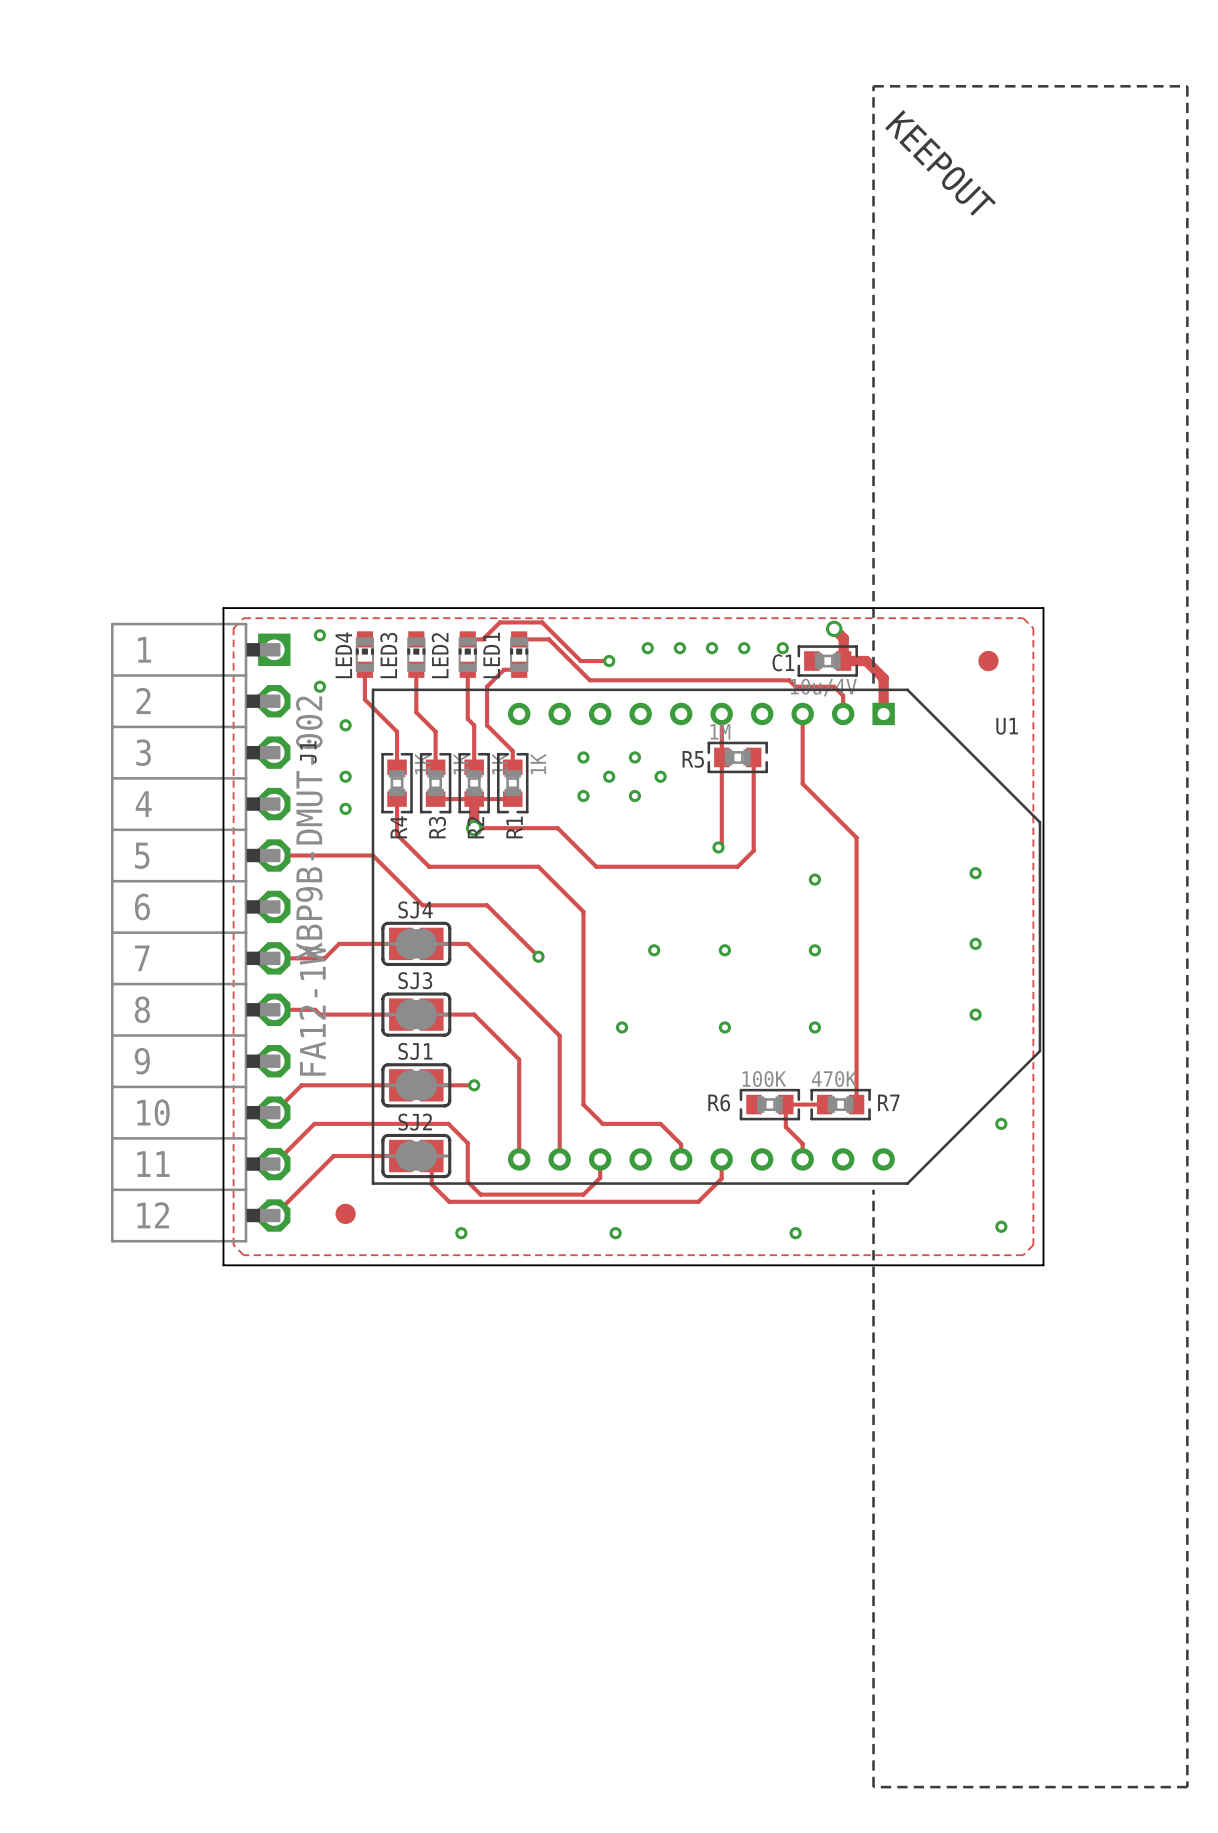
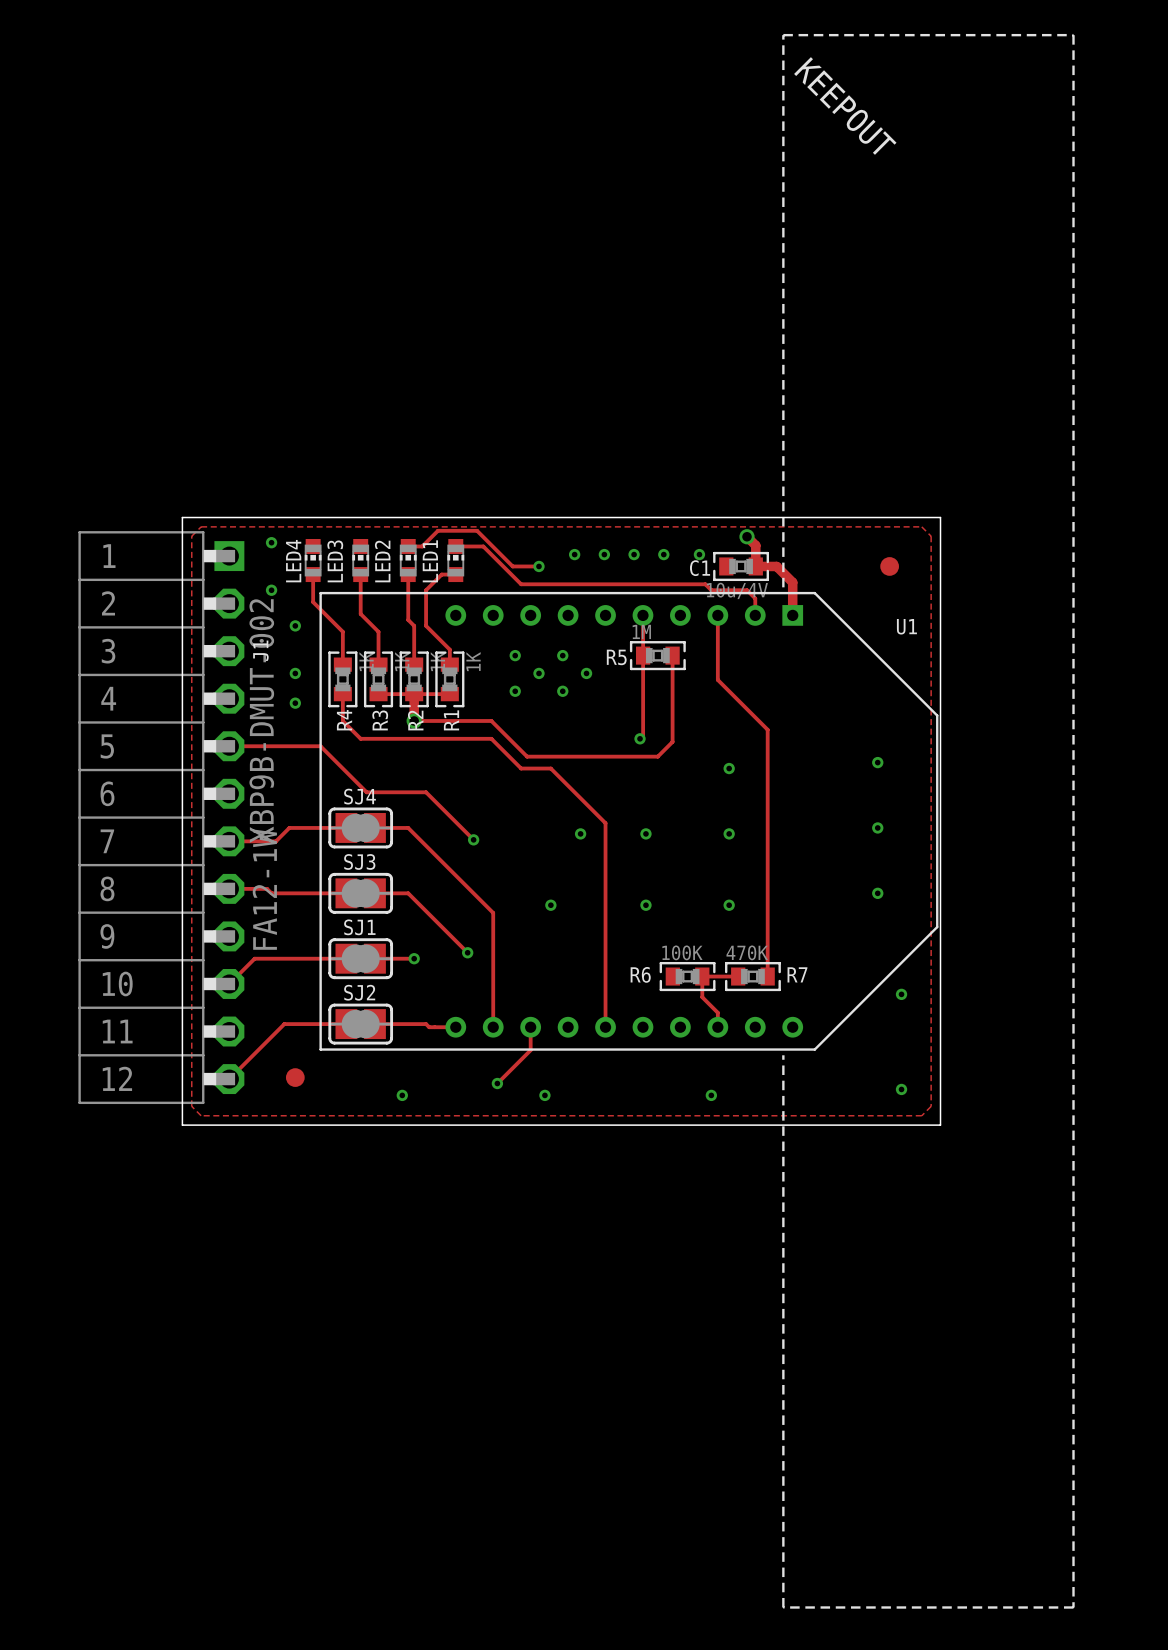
track: (397, 828) (397, 834) (429, 866) (538, 866) (583, 911) (583, 1104) (602, 1123) (660, 1123) (681, 1144) -> (342, 720) (360, 738) (491, 738) (521, 768) (550, 768) (605, 823) (605, 1013)
track: (467, 1014) (474, 1014) (519, 1059) (519, 1159) -> (408, 893) (467, 952)
via: none -> (467, 952)
track: (431, 1156) (431, 1184) (449, 1201) (698, 1201) (721, 1178) (721, 1159) -> (374, 1024) (426, 1024) (429, 1027) (455, 1027)
track: (274, 1164) (314, 1123) (448, 1123) (467, 1143) (467, 1181) (480, 1194) (583, 1194) (600, 1177) -> (497, 1083) (530, 1050) (530, 1044)
via: none -> (497, 1083)

